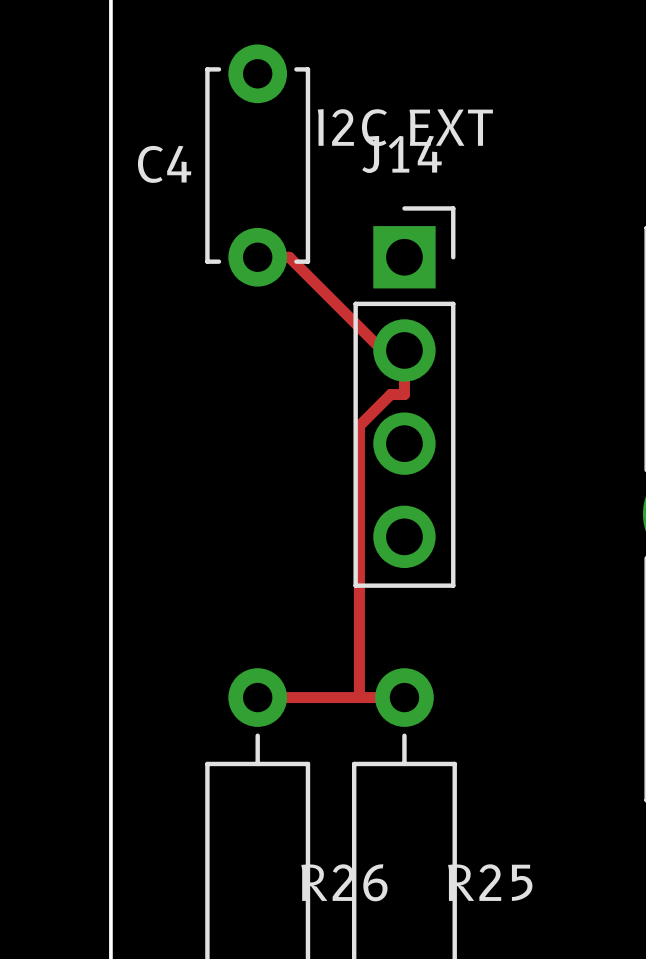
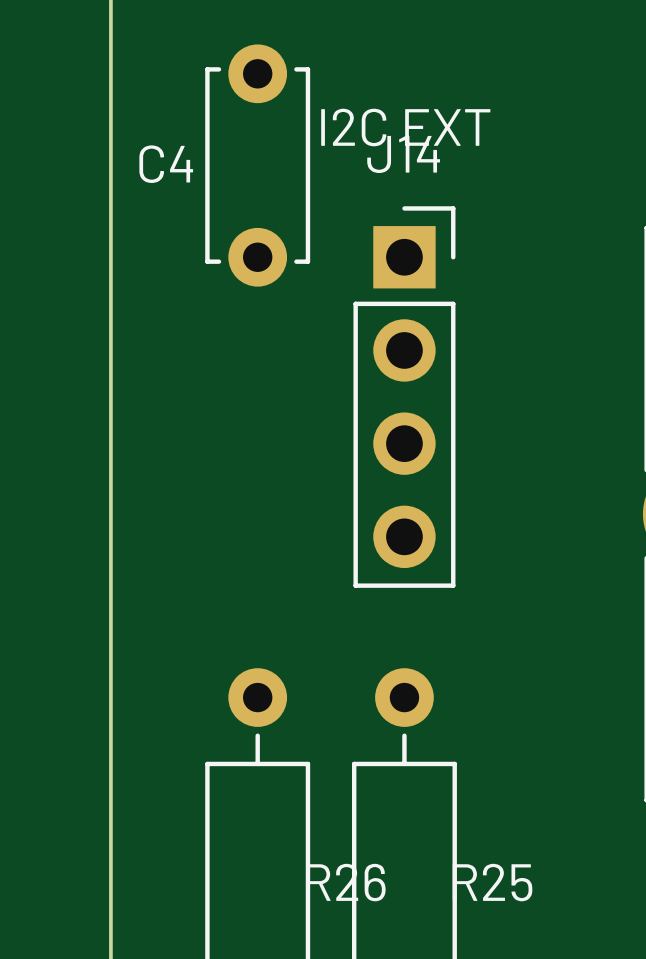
track: (257, 257) (289, 257) (404, 372) -> none
track: (404, 350) (404, 394) (390, 394) (359, 425) (359, 697) -> none
track: (257, 697) (404, 697) -> none

